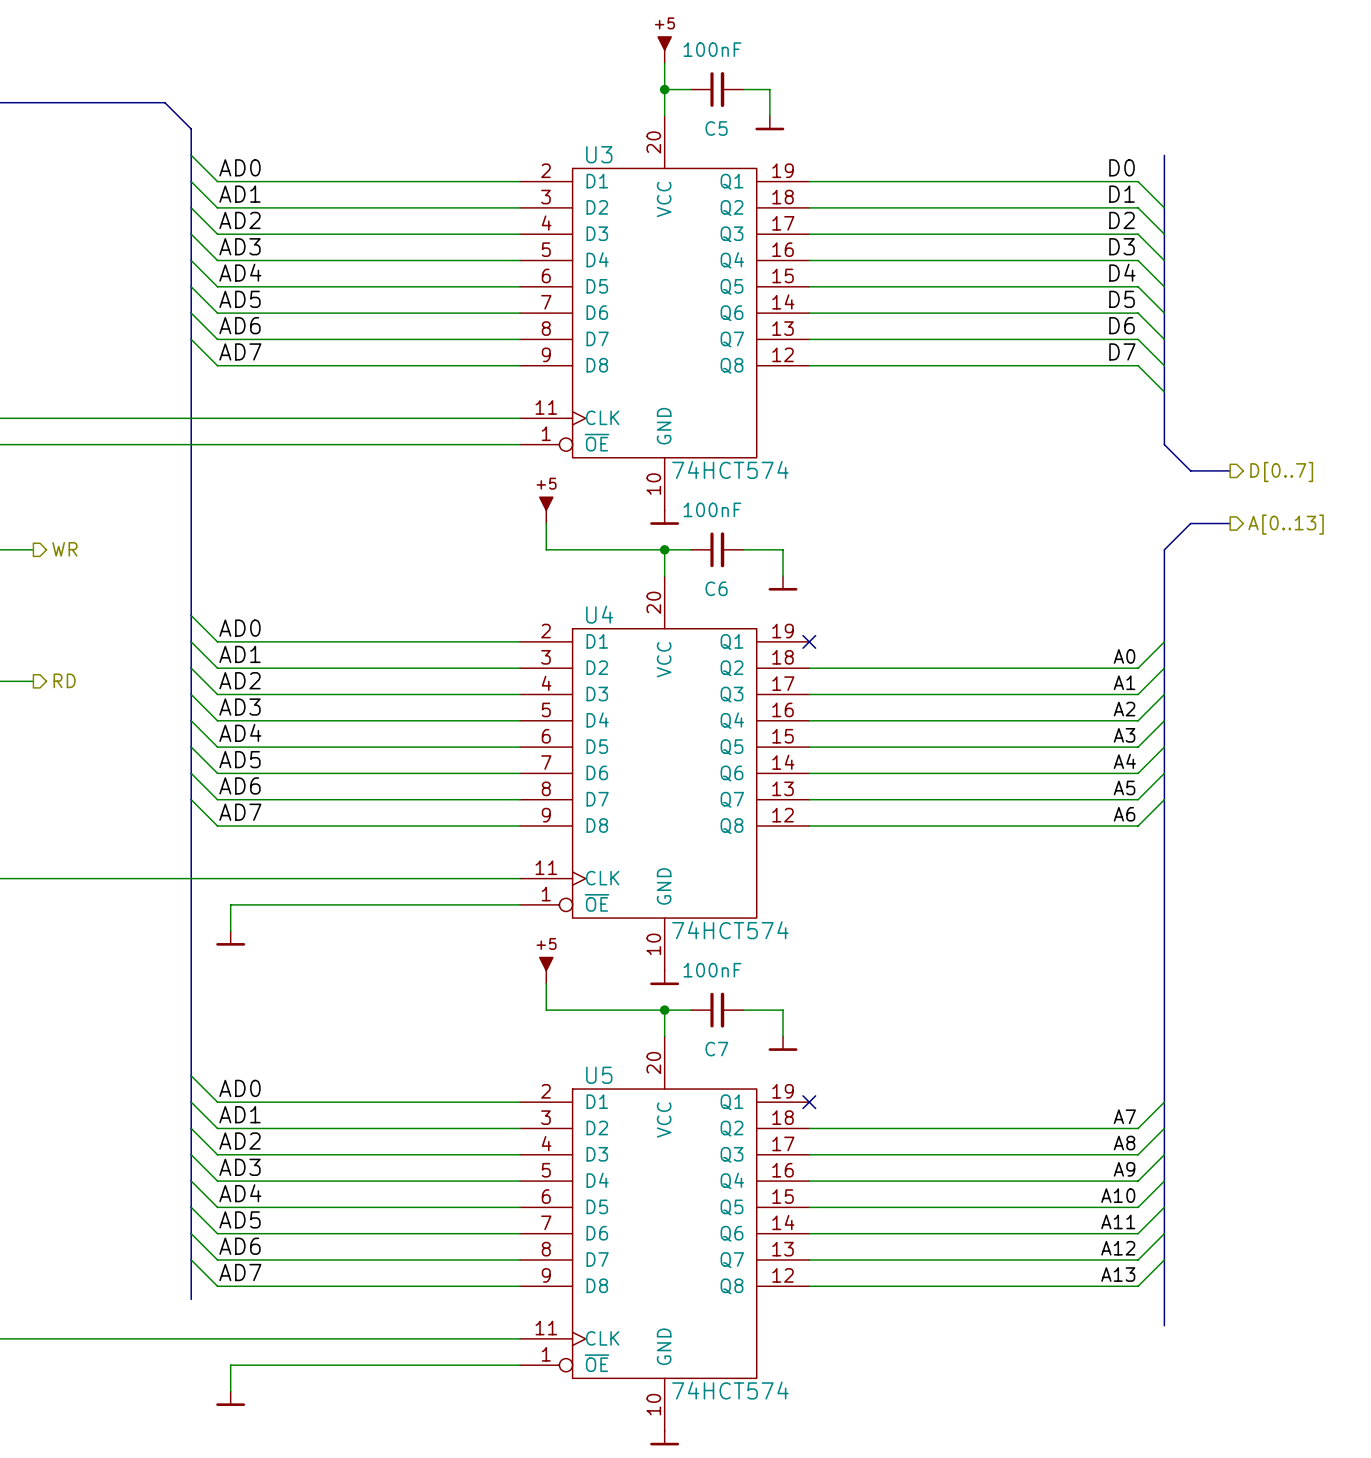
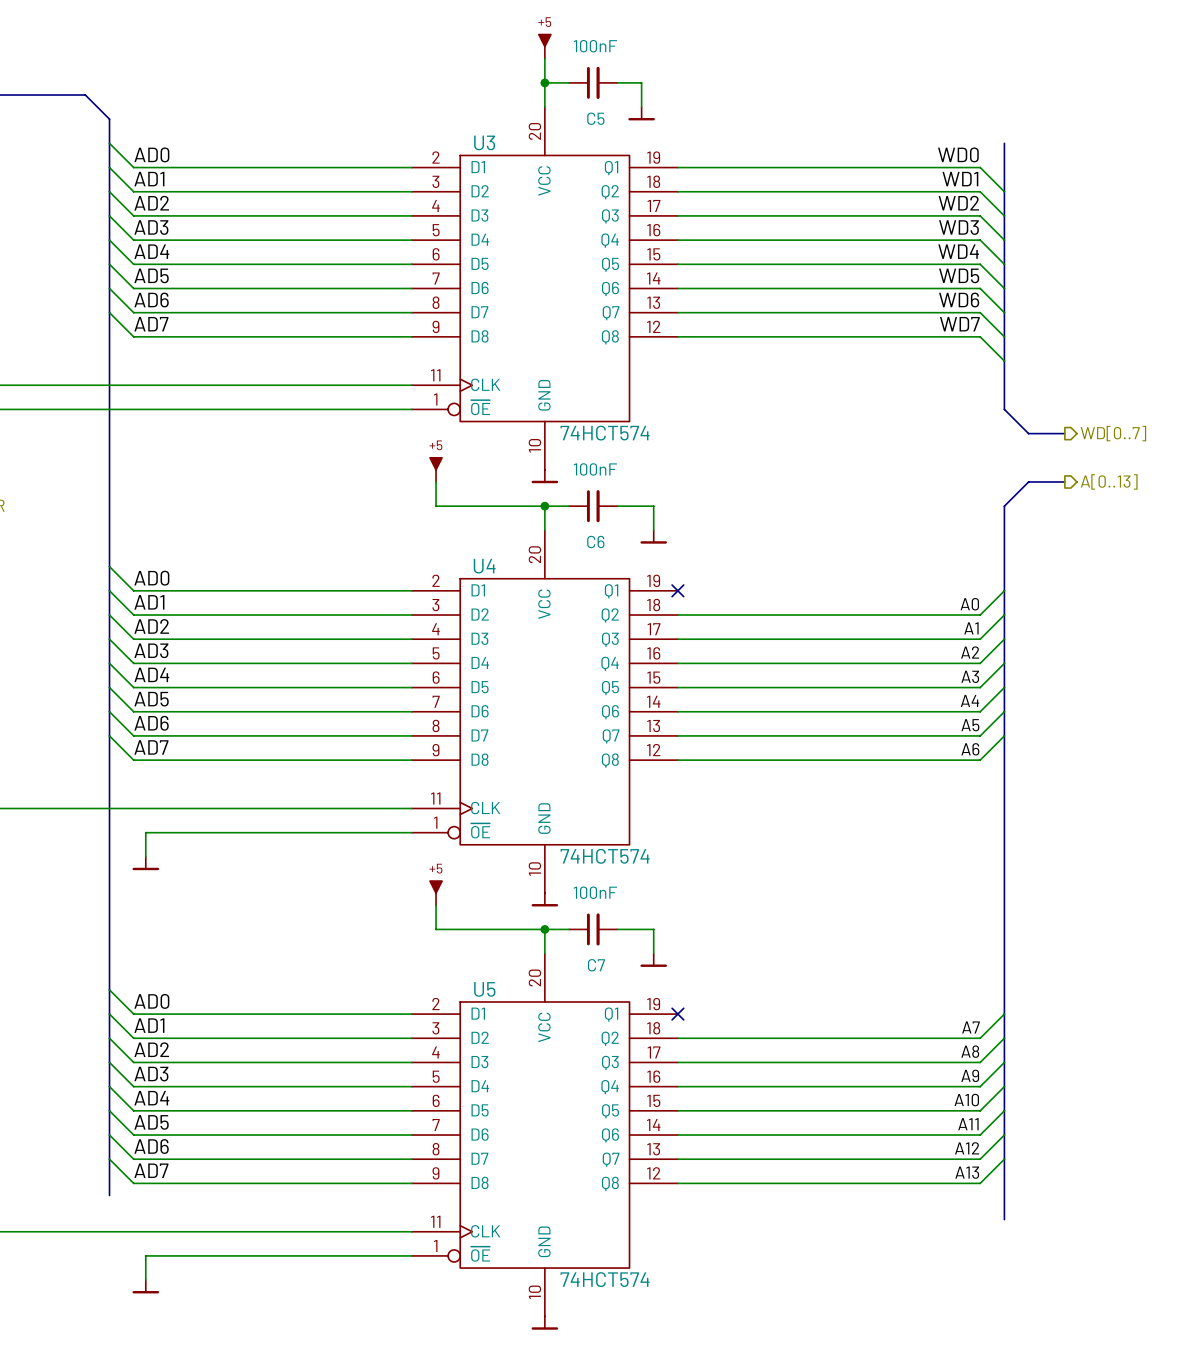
label: D0 (1122, 167) -> WD0 (958, 154)
label: D1 (1122, 194) -> WD1 (960, 179)
label: D2 (1122, 220) -> WD2 (958, 203)
label: D3 (1122, 246) -> WD3 (958, 227)
label: D4 (1122, 272) -> WD4 (958, 251)
label: D5 (1122, 299) -> WD5 (959, 275)
label: D6 (1122, 325) -> WD6 (959, 300)
label: D7 (1122, 351) -> WD7 (959, 324)
hierarchical label: D[0..7] (1281, 472) -> WD[0..7] (1113, 433)

